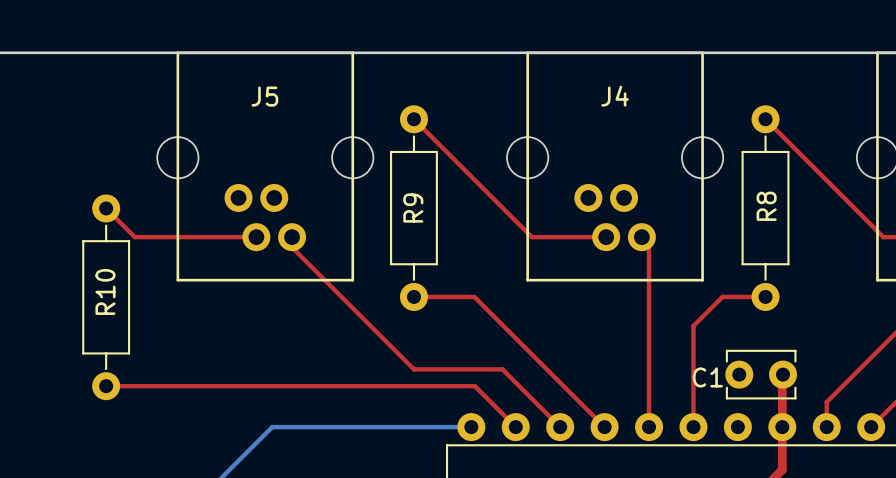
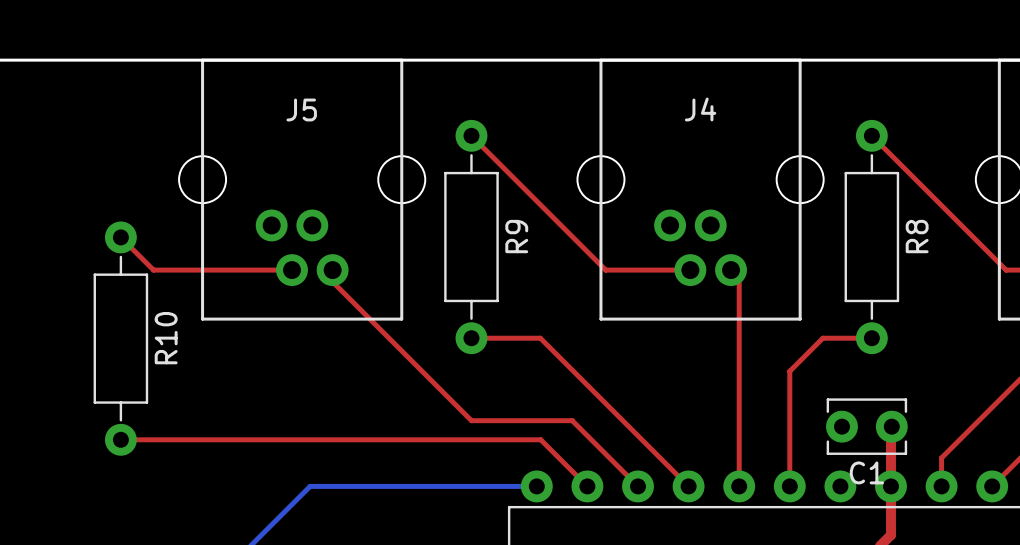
R8 name position: R8 (766, 206) -> R8 (917, 236)
R9 name position: R9 (413, 208) -> R9 (516, 236)
R10 name position: R10 (105, 292) -> R10 (166, 338)
C1 name position: C1 (707, 377) -> C1 (866, 472)

